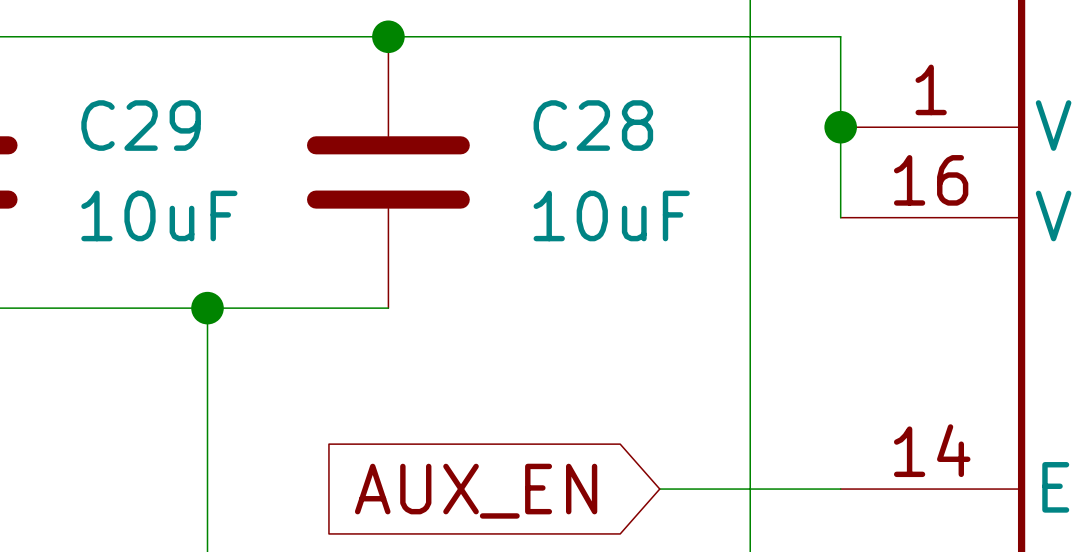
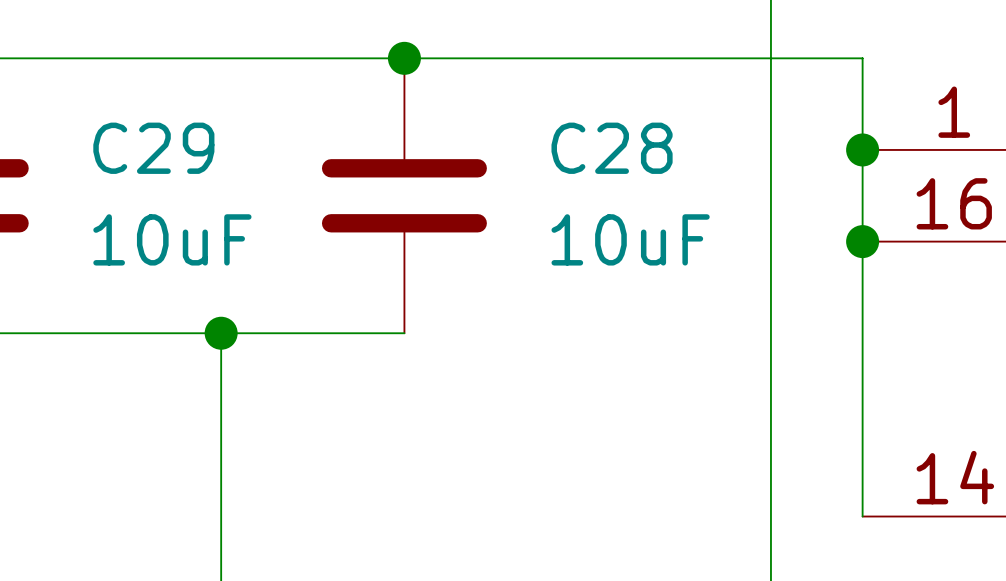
junction: none -> (862, 241)
wire: (659, 489) (840, 489) -> (862, 241) (862, 516)
global label: AUX_EN (476, 491) -> none

